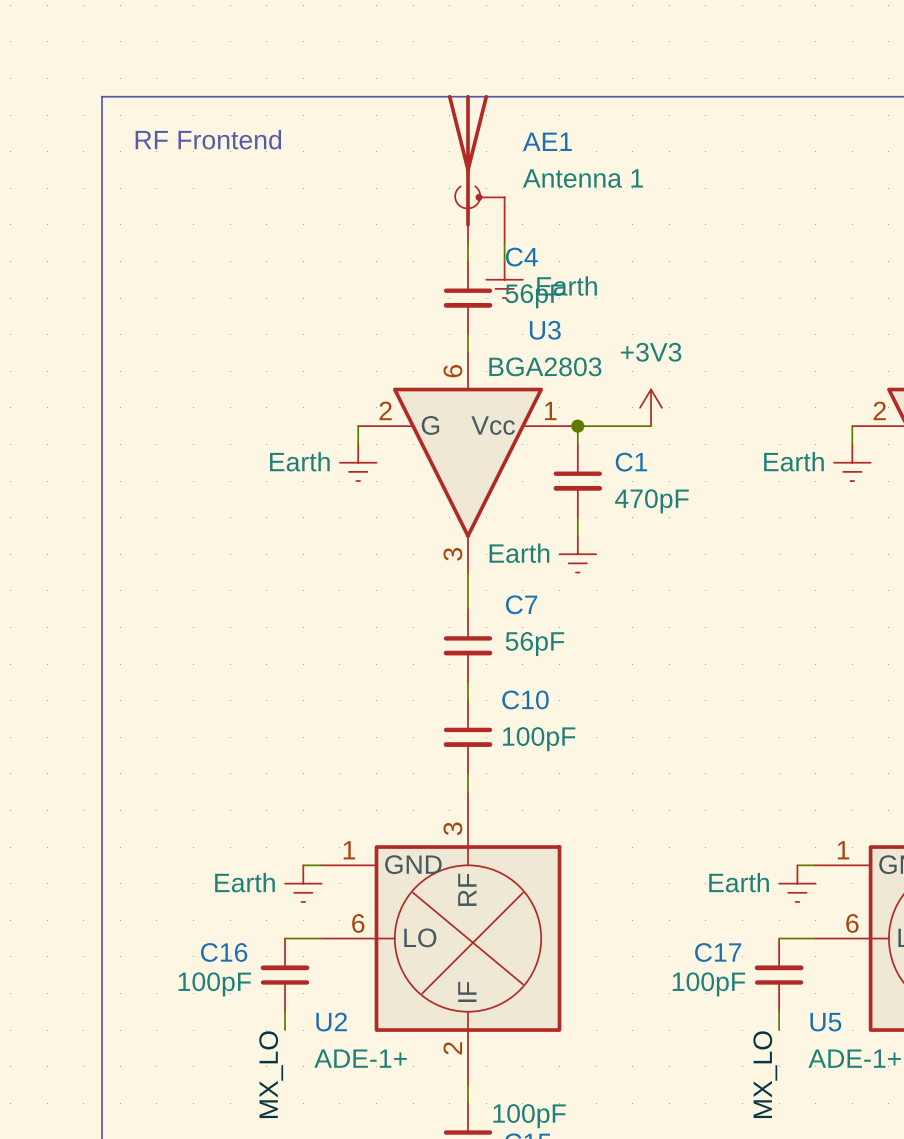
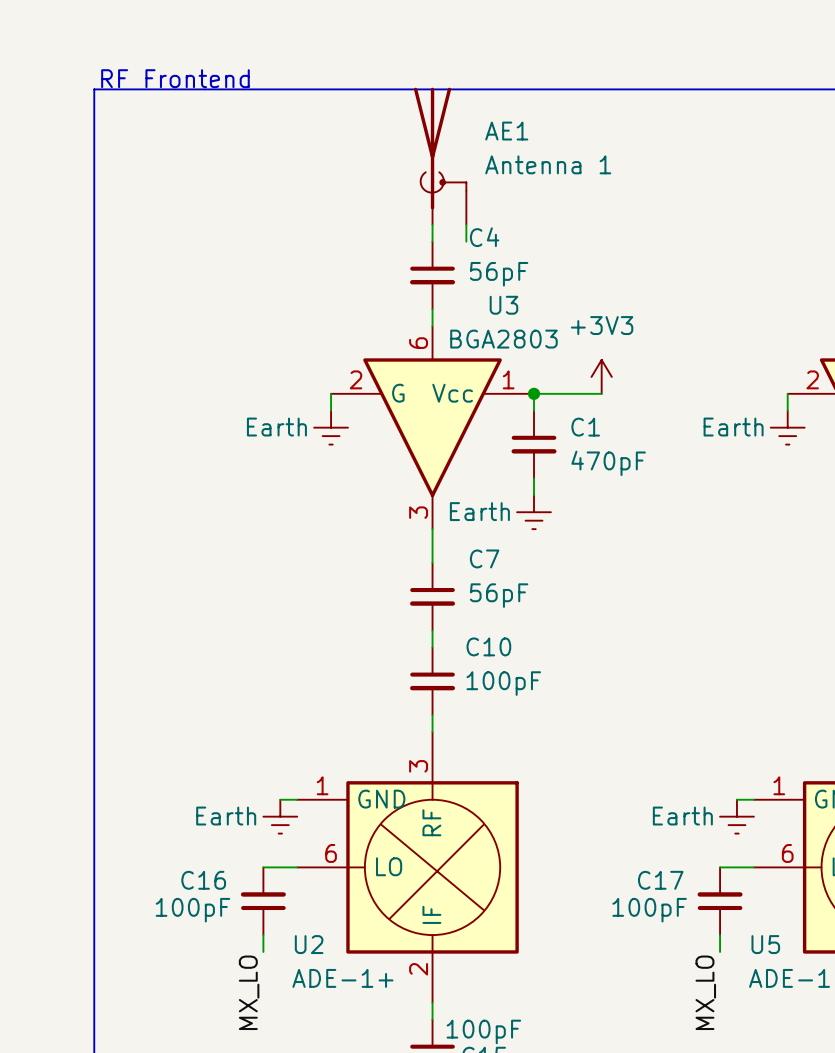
text position: RF Frontend (208, 139) -> RF Frontend (175, 78)
power symbol: Earth (504, 279) -> none

